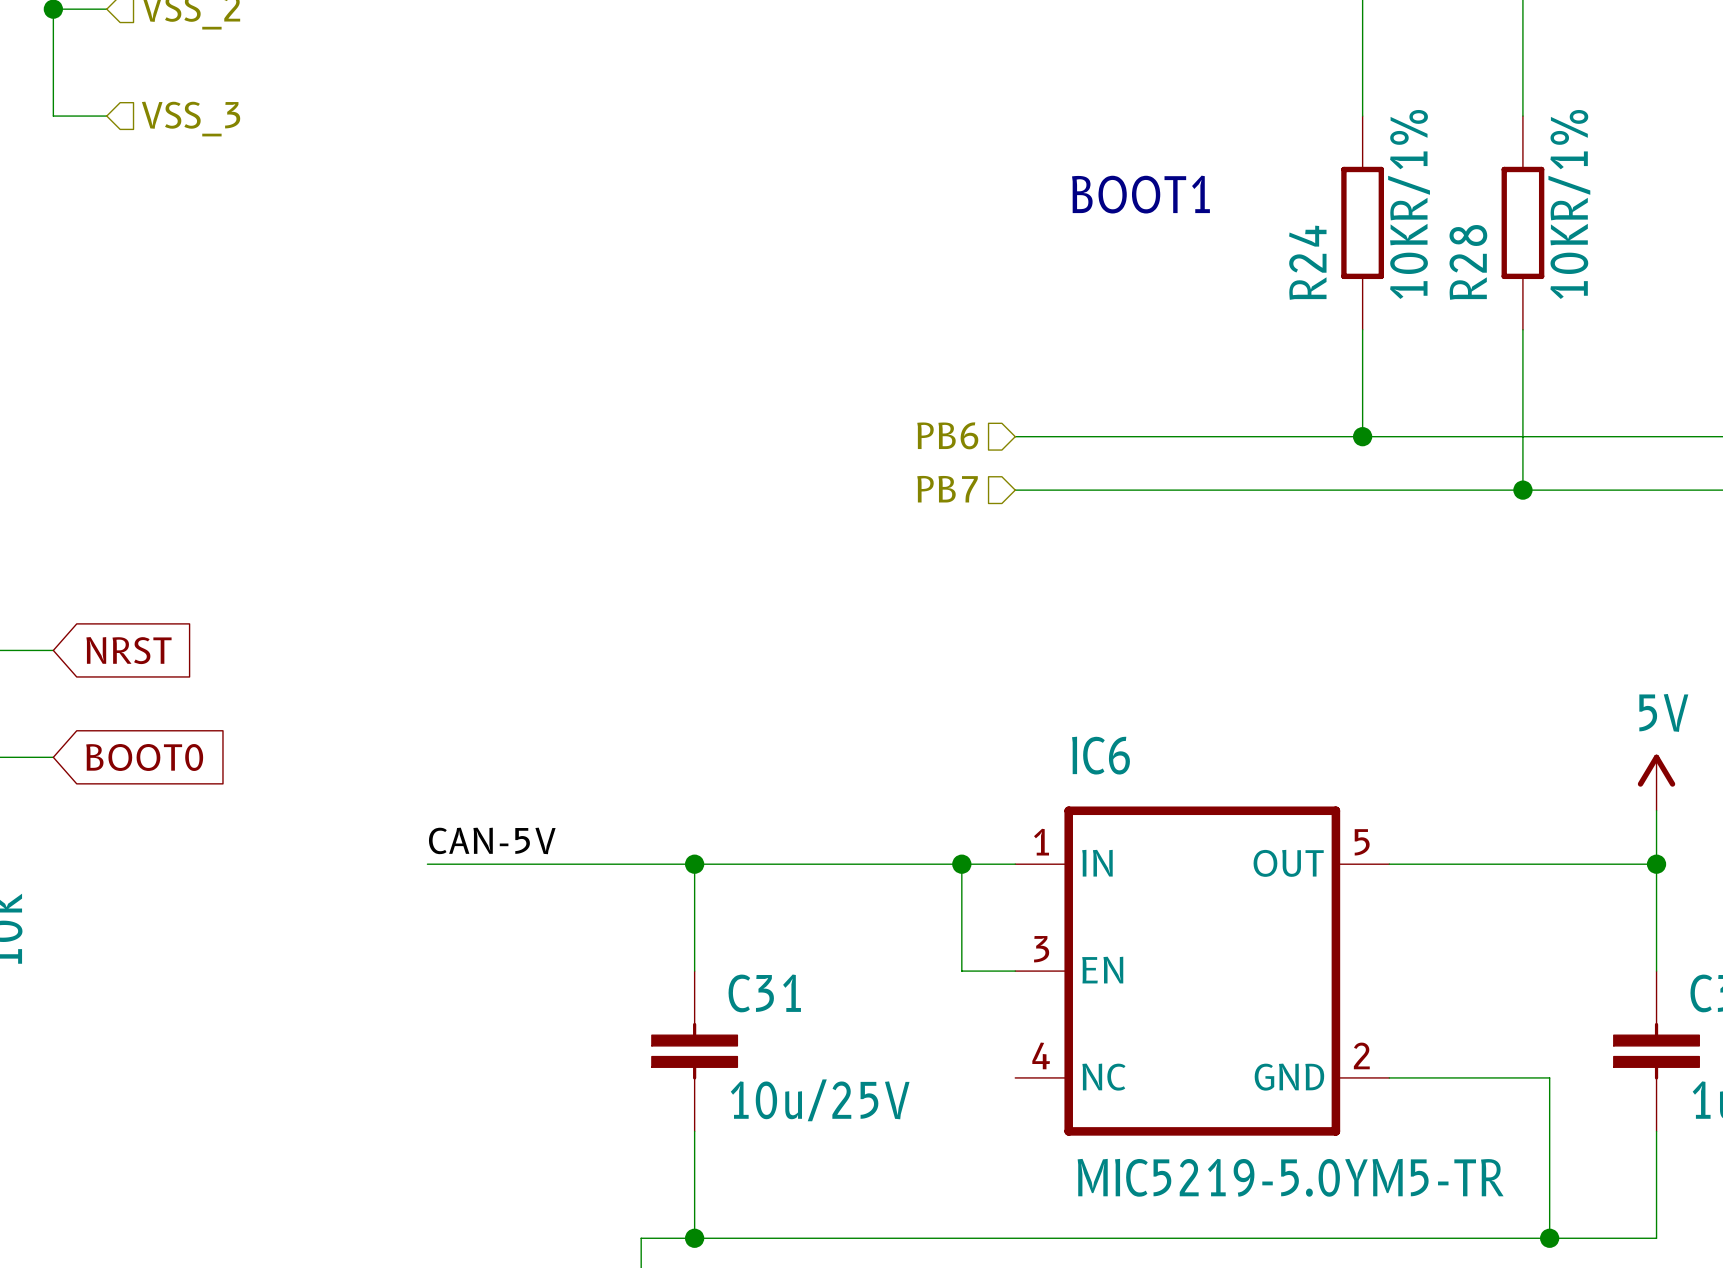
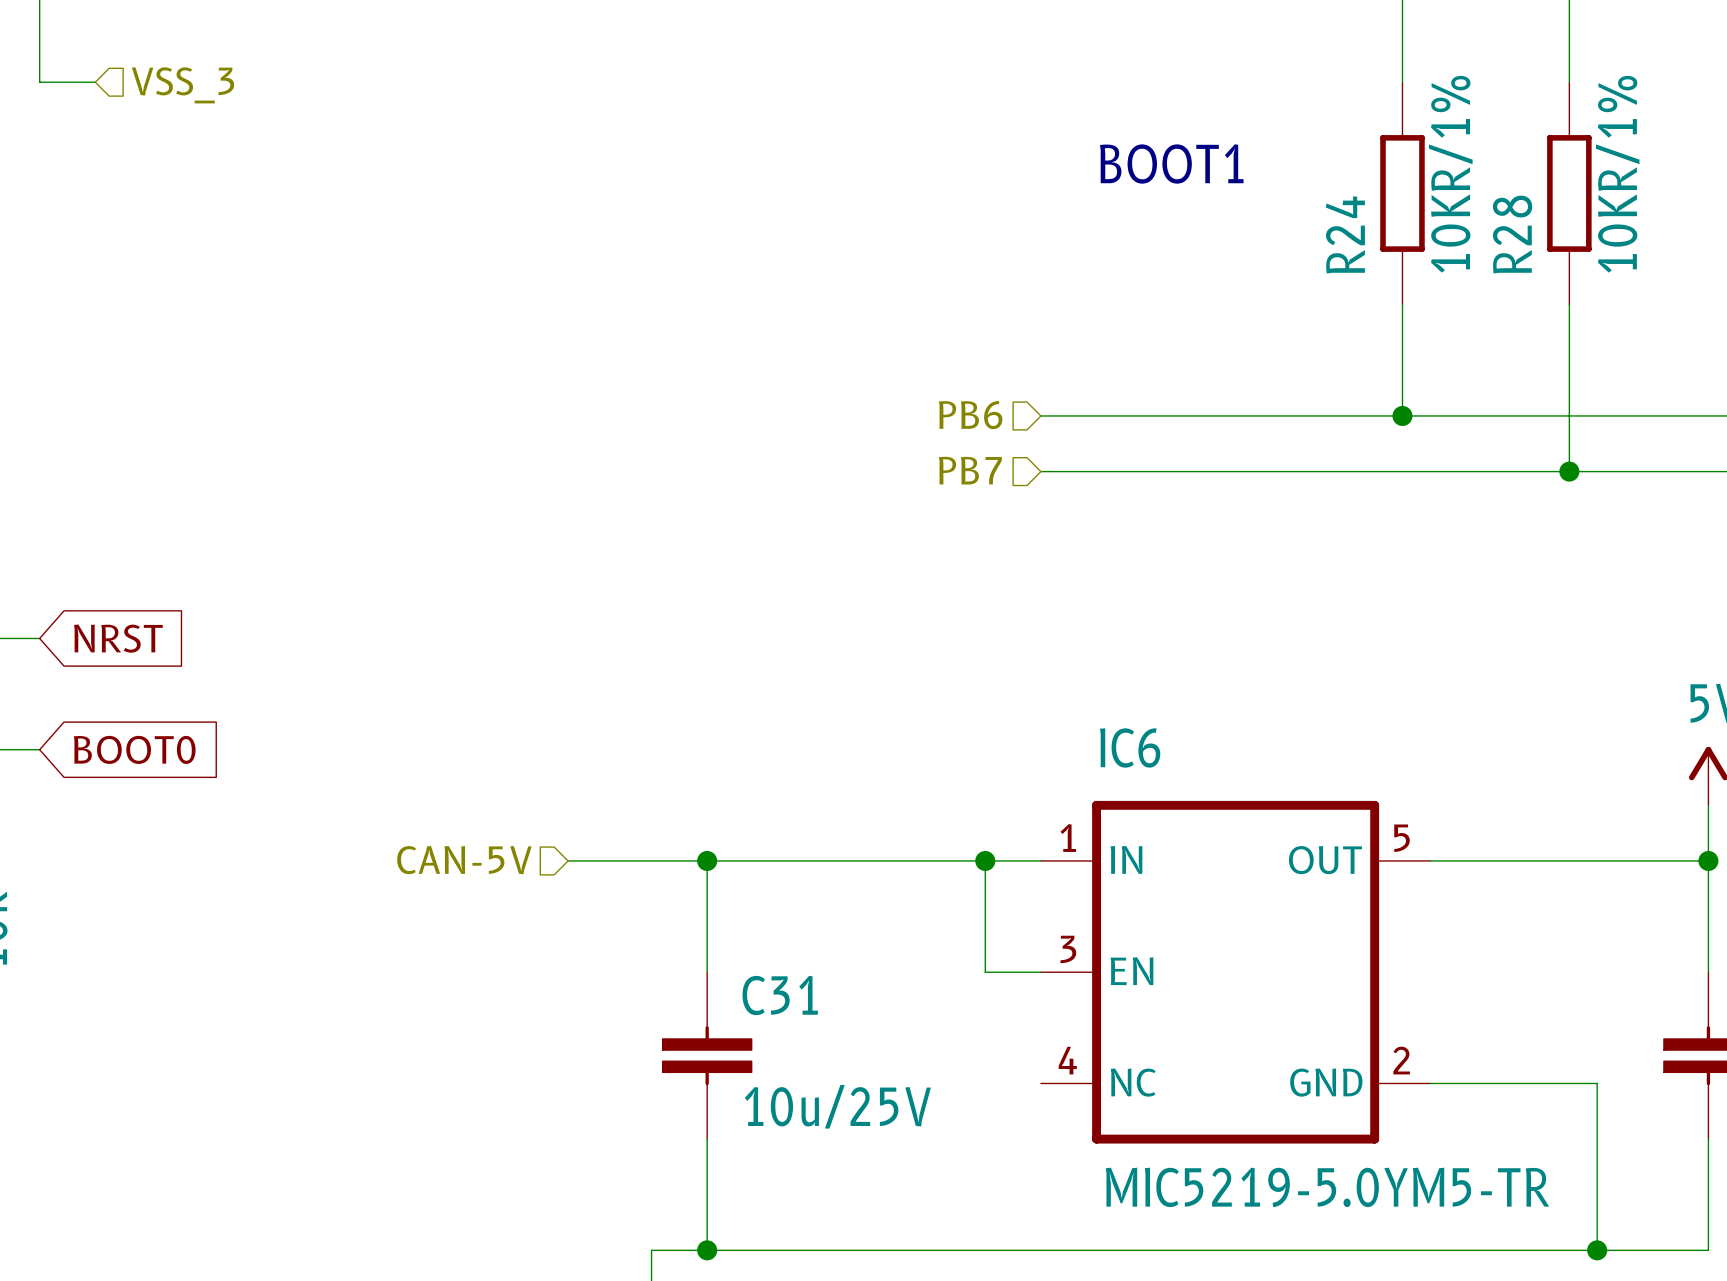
label: CAN-5V (492, 840) -> none
hierarchical label: none -> CAN-5V (464, 860)
wire: (427, 864) (561, 864) -> none

